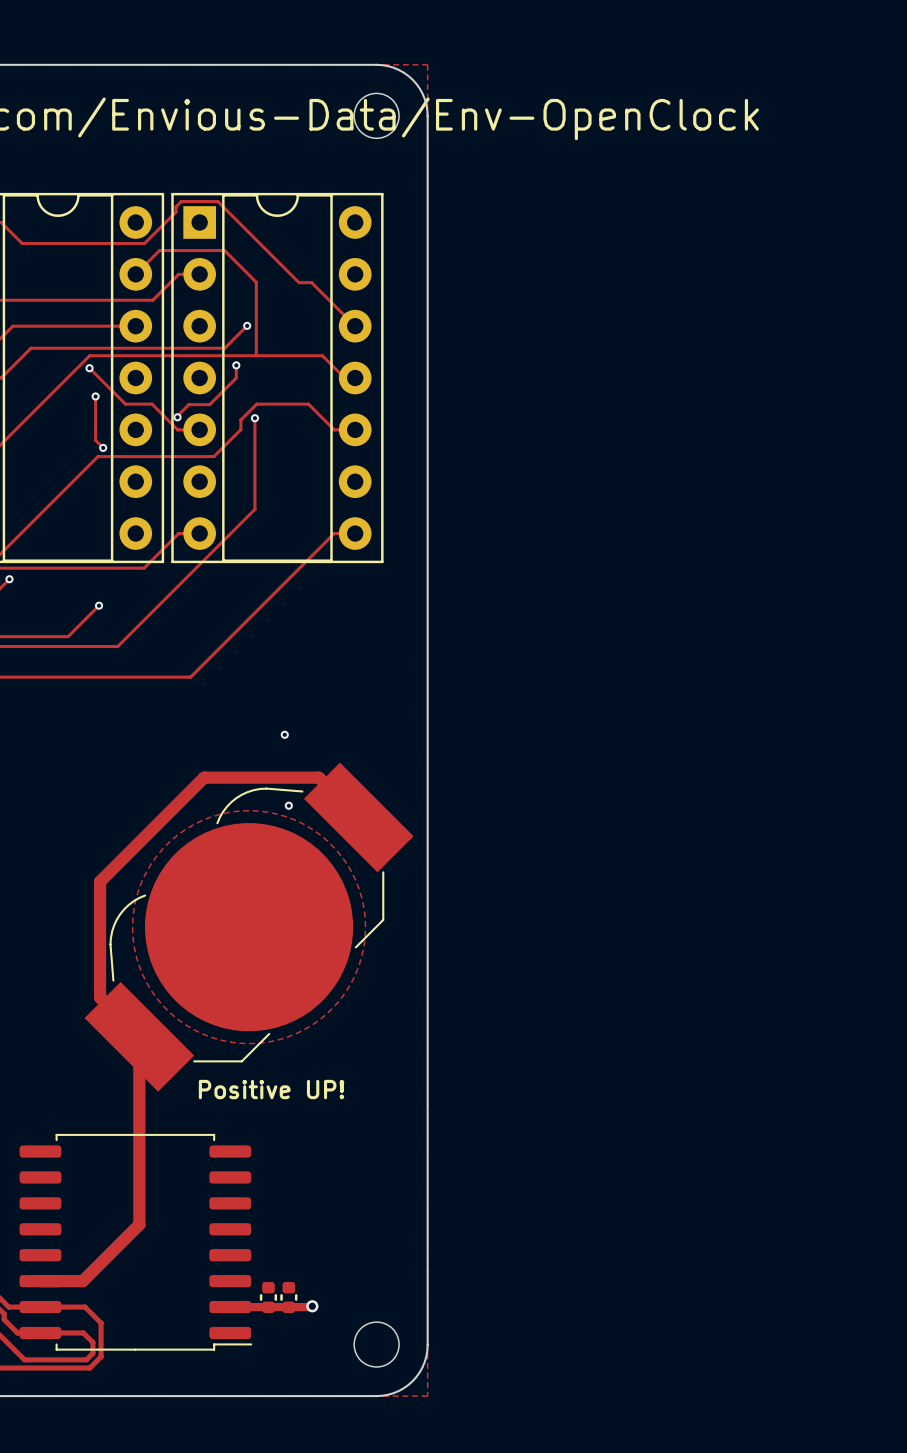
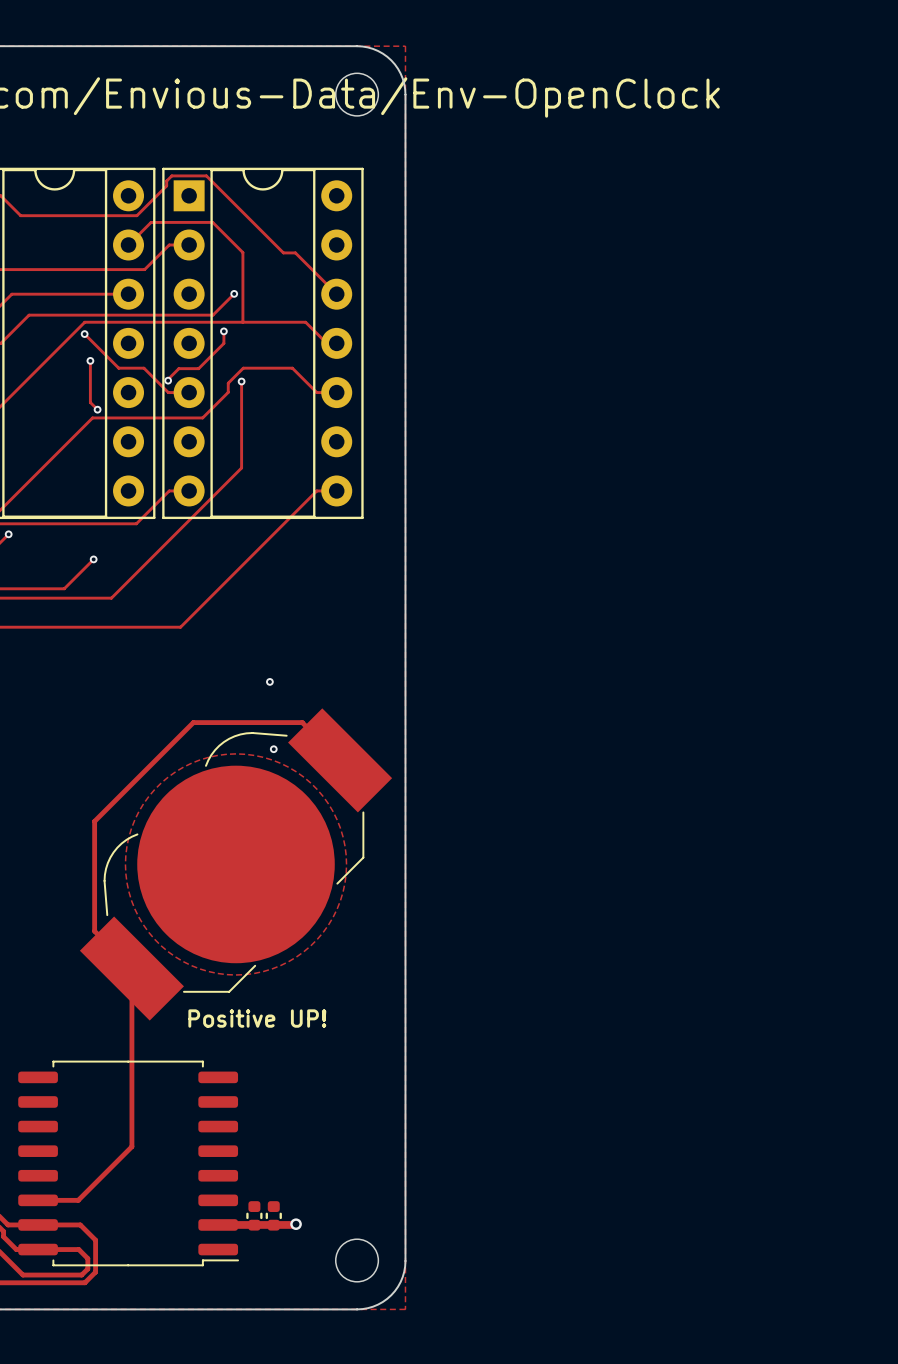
track width: thick (358, 817) (318, 777) (204, 777) (100, 881) (100, 997) (139, 1036) (139, 1224) (82, 1281) (40, 1281) -> thin (340, 760) (302, 722) (193, 722) (94, 821) (94, 931) (131, 968) (131, 1146) (78, 1200) (38, 1200)

